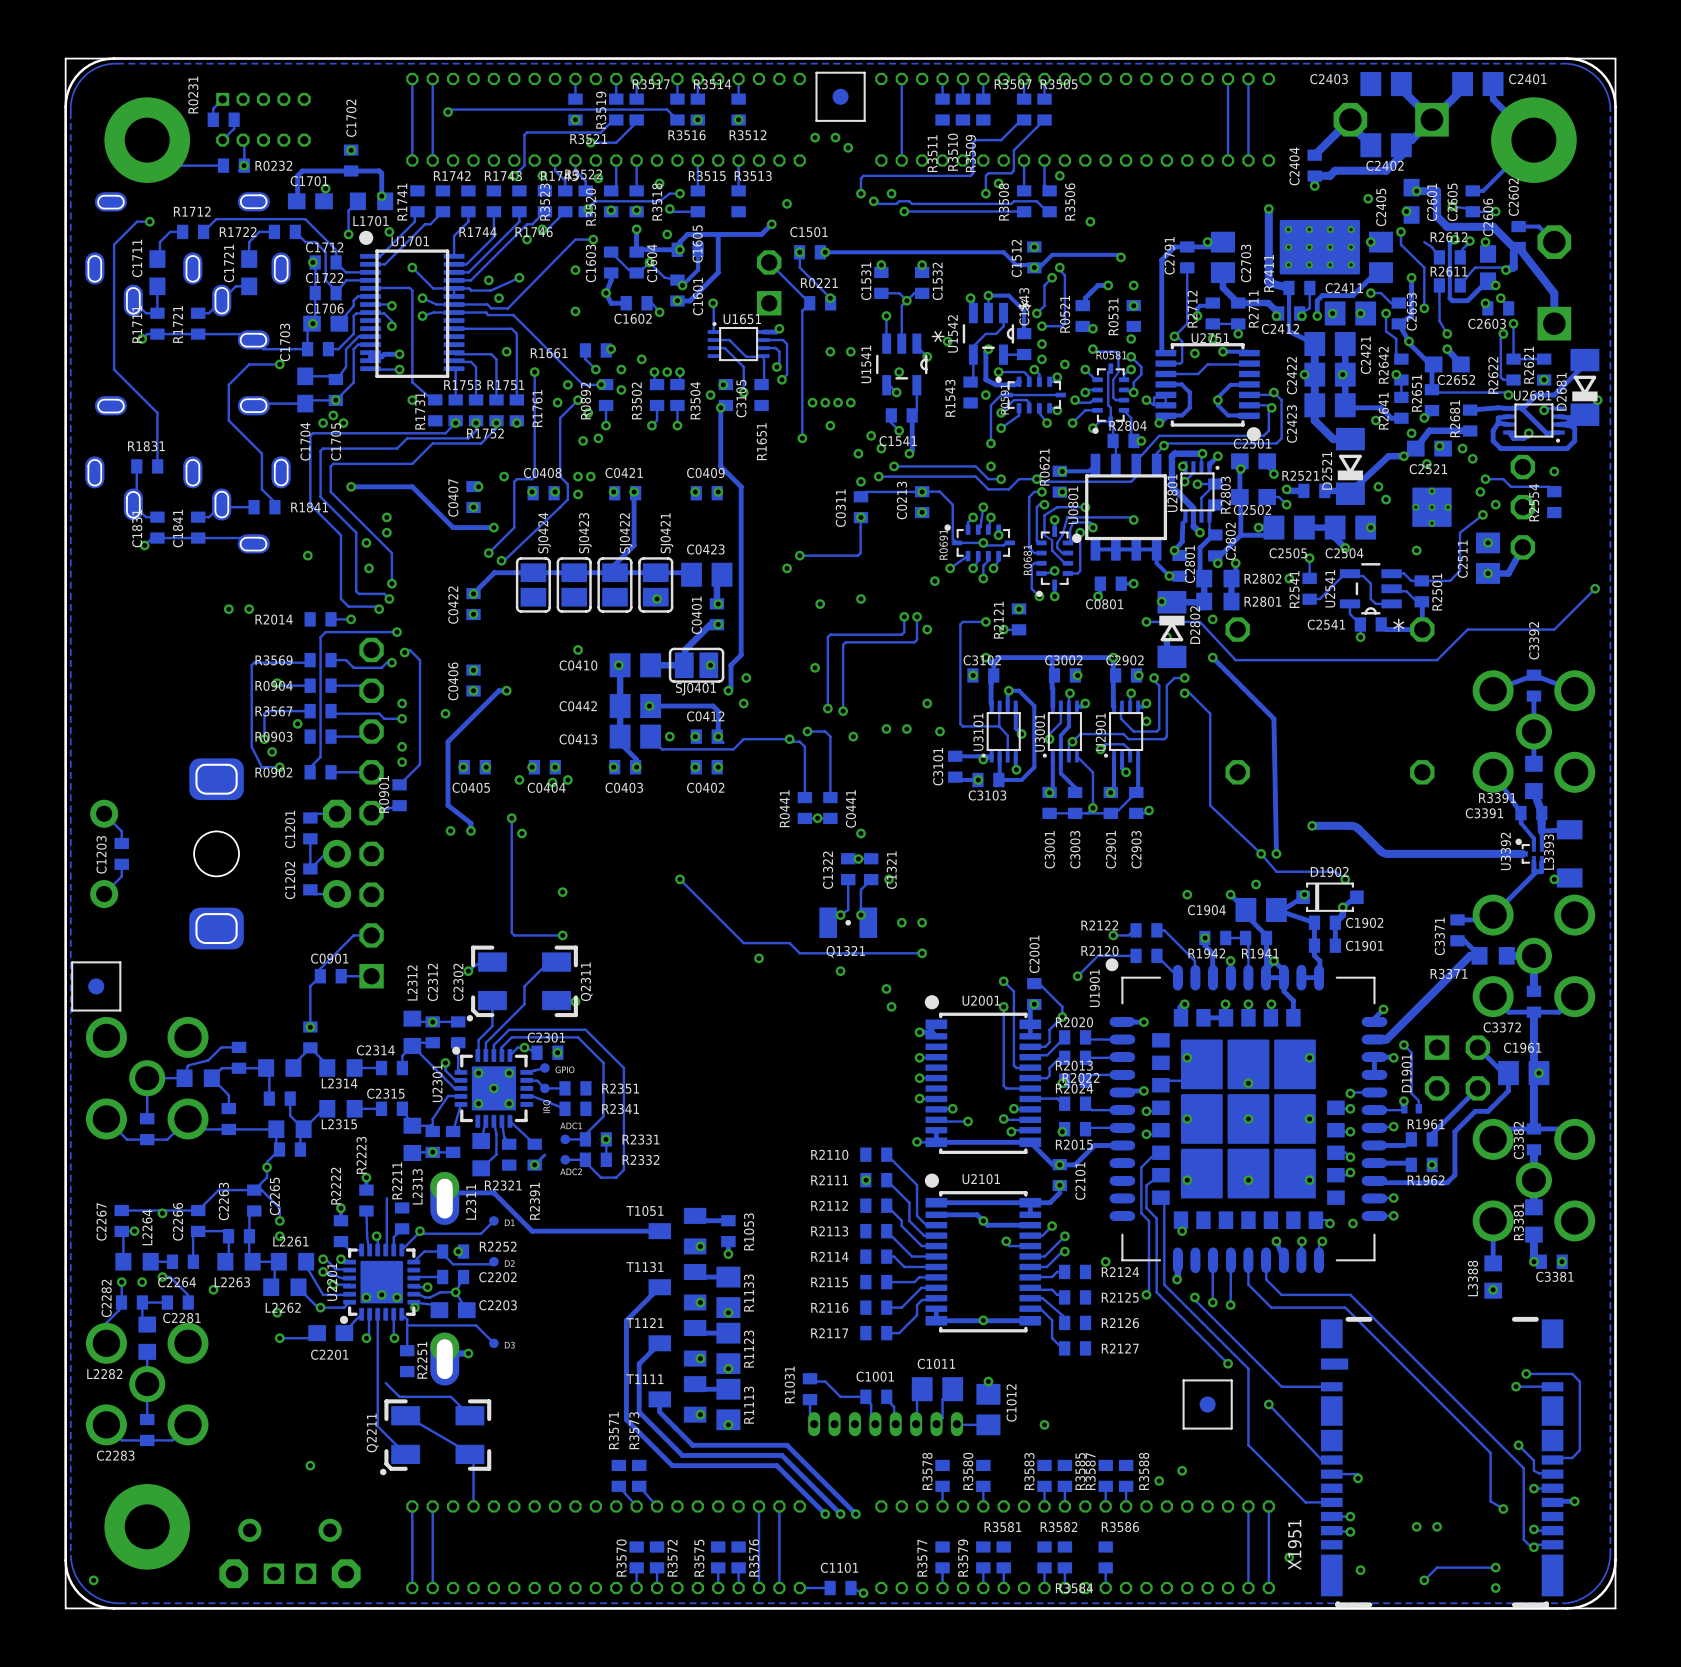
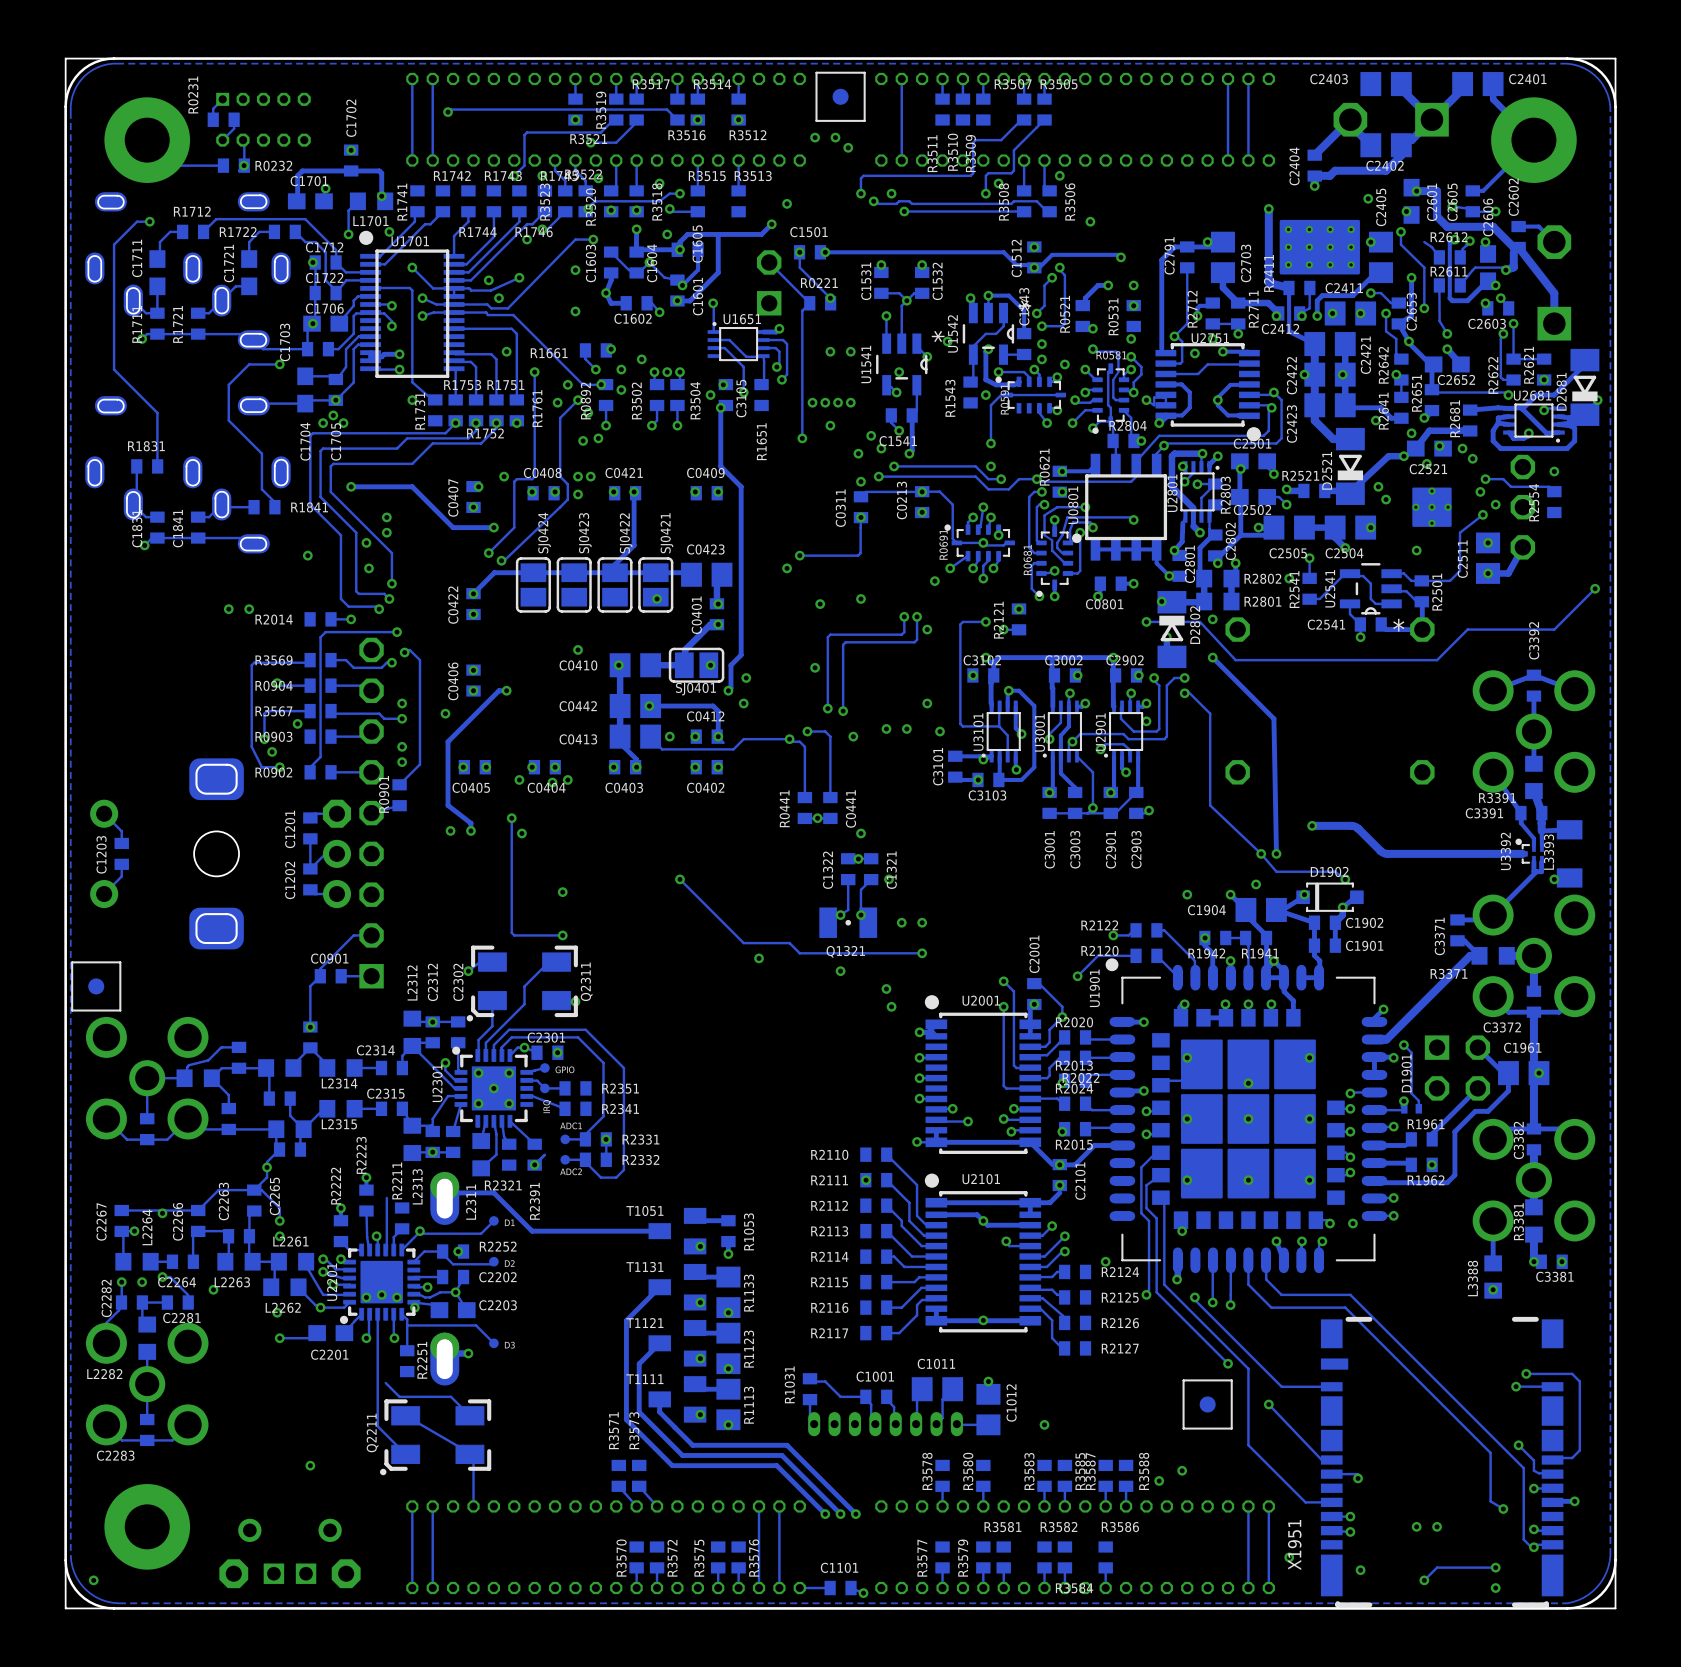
track: (1019, 408) (1019, 415) (1001, 428) -> none
track: (1029, 408) (1029, 402) (1026, 400) (1013, 400) (1001, 412) -> none
via: (1001, 412) -> none
via: (1001, 428) -> none

